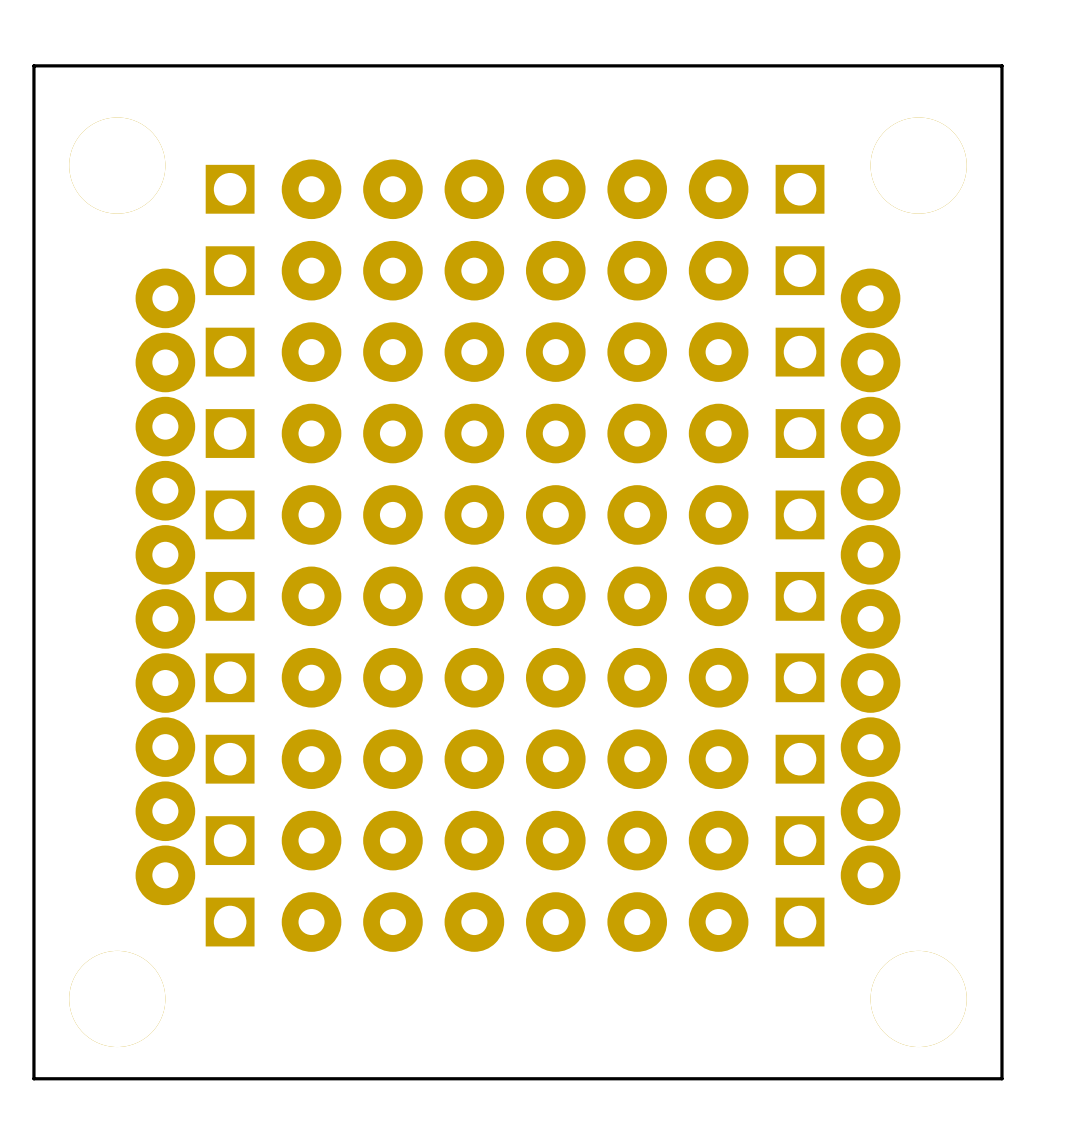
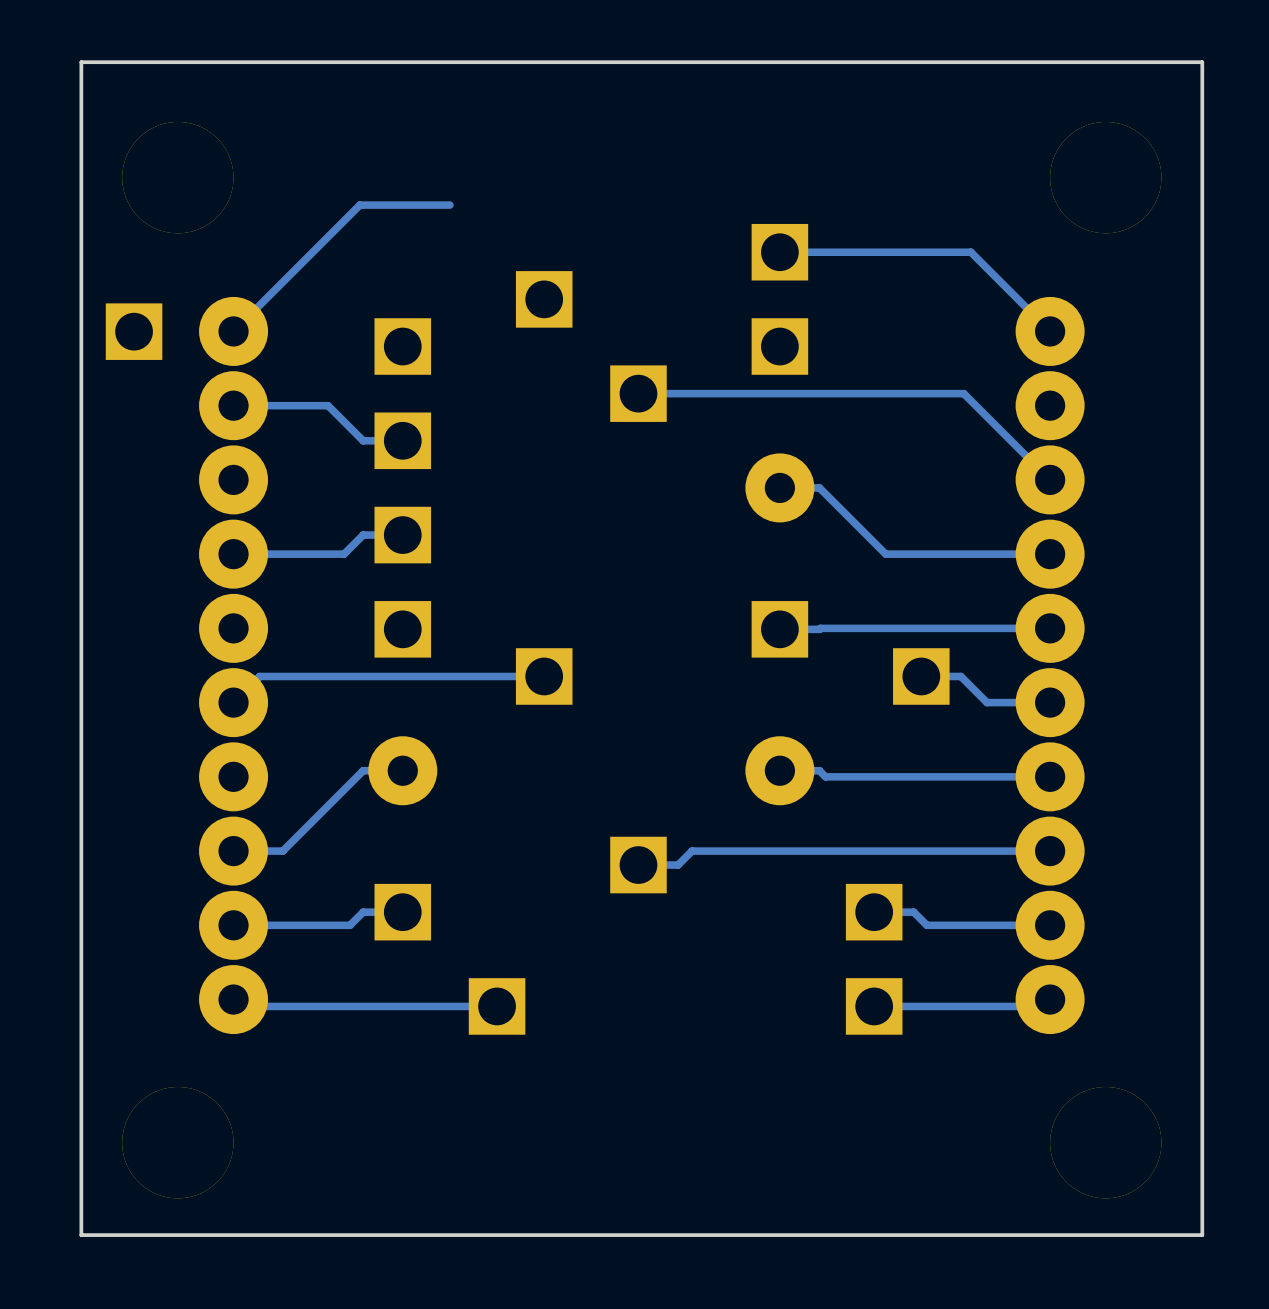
part: (230, 189) -> none
part: (311, 189) -> none
track: none -> (449, 205) (359, 205) (233, 331)
part: (392, 189) -> none
part: (474, 189) -> none
part: (555, 189) -> none
part: (637, 189) -> none
part: (718, 189) -> none
part: (800, 189) -> none
track: none -> (779, 252) (970, 252) (1050, 331)
part: none -> (779, 252)
part: (230, 270) -> none
part: (311, 270) -> none
part: (392, 270) -> none
part: none -> (544, 299)
part: (474, 270) -> none
part: (555, 270) -> none
part: (637, 270) -> none
part: (718, 270) -> none
part: (800, 270) -> none
part: none -> (134, 331)
part: none -> (402, 346)
part: none -> (779, 346)
part: (230, 352) -> none
part: (311, 352) -> none
part: (392, 352) -> none
part: (474, 352) -> none
track: none -> (638, 393) (963, 393) (1050, 479)
part: none -> (638, 393)
part: (555, 352) -> none
part: (637, 352) -> none
part: (718, 352) -> none
part: (800, 352) -> none
track: none -> (233, 405) (328, 405) (363, 440) (402, 440)
part: none -> (402, 440)
part: (230, 433) -> none
part: (311, 433) -> none
part: (392, 433) -> none
part: (474, 433) -> none
part: (555, 433) -> none
track: none -> (779, 487) (819, 487) (885, 554) (1050, 554)
part: (718, 433) -> none
part: (800, 433) -> none
track: none -> (402, 535) (363, 535) (344, 554) (233, 554)
part: none -> (402, 535)
part: (230, 514) -> none
part: (311, 514) -> none
part: (392, 514) -> none
part: (474, 514) -> none
part: (555, 514) -> none
part: (637, 514) -> none
part: (718, 514) -> none
part: (800, 514) -> none
track: none -> (1050, 628) (779, 629)
part: none -> (402, 629)
part: none -> (779, 629)
part: (230, 596) -> none
part: (311, 596) -> none
part: (392, 596) -> none
track: none -> (544, 676) (259, 676) (233, 702)
part: none -> (544, 676)
part: (474, 596) -> none
part: (555, 596) -> none
part: (637, 596) -> none
part: (718, 596) -> none
track: none -> (921, 676) (960, 676) (987, 702) (1050, 702)
part position: (800, 596) -> (921, 676)
part: (230, 677) -> none
track: none -> (402, 770) (363, 770) (282, 851) (233, 851)
part: (392, 677) -> none
part: (474, 677) -> none
part: (555, 677) -> none
track: none -> (779, 770) (819, 770) (825, 776) (1050, 776)
part: (718, 677) -> none
part: (800, 677) -> none
track: none -> (1050, 851) (692, 851) (678, 865) (638, 865)
part: (230, 759) -> none
part: (311, 759) -> none
part: (392, 759) -> none
part: (474, 759) -> none
part: none -> (638, 865)
part: (555, 759) -> none
part: (637, 759) -> none
part: (718, 759) -> none
part: (800, 759) -> none
track: none -> (402, 912) (363, 912) (350, 925) (233, 925)
part: none -> (402, 912)
track: none -> (874, 912) (913, 912) (926, 925) (1050, 925)
part: none -> (874, 912)
part: (230, 840) -> none
part: (311, 840) -> none
part: (392, 840) -> none
part: (474, 840) -> none
part: (555, 840) -> none
part: (637, 840) -> none
part: (718, 840) -> none
part: (800, 840) -> none
track: none -> (233, 999) (240, 1006) (497, 1006)
track: none -> (1050, 999) (1043, 1006) (874, 1006)
part: none -> (497, 1006)
part: none -> (874, 1006)
part: (230, 922) -> none
part: (311, 922) -> none
part: (392, 922) -> none
part: (474, 922) -> none
part: (555, 922) -> none
part: (637, 922) -> none
part: (718, 922) -> none
part: (800, 922) -> none

